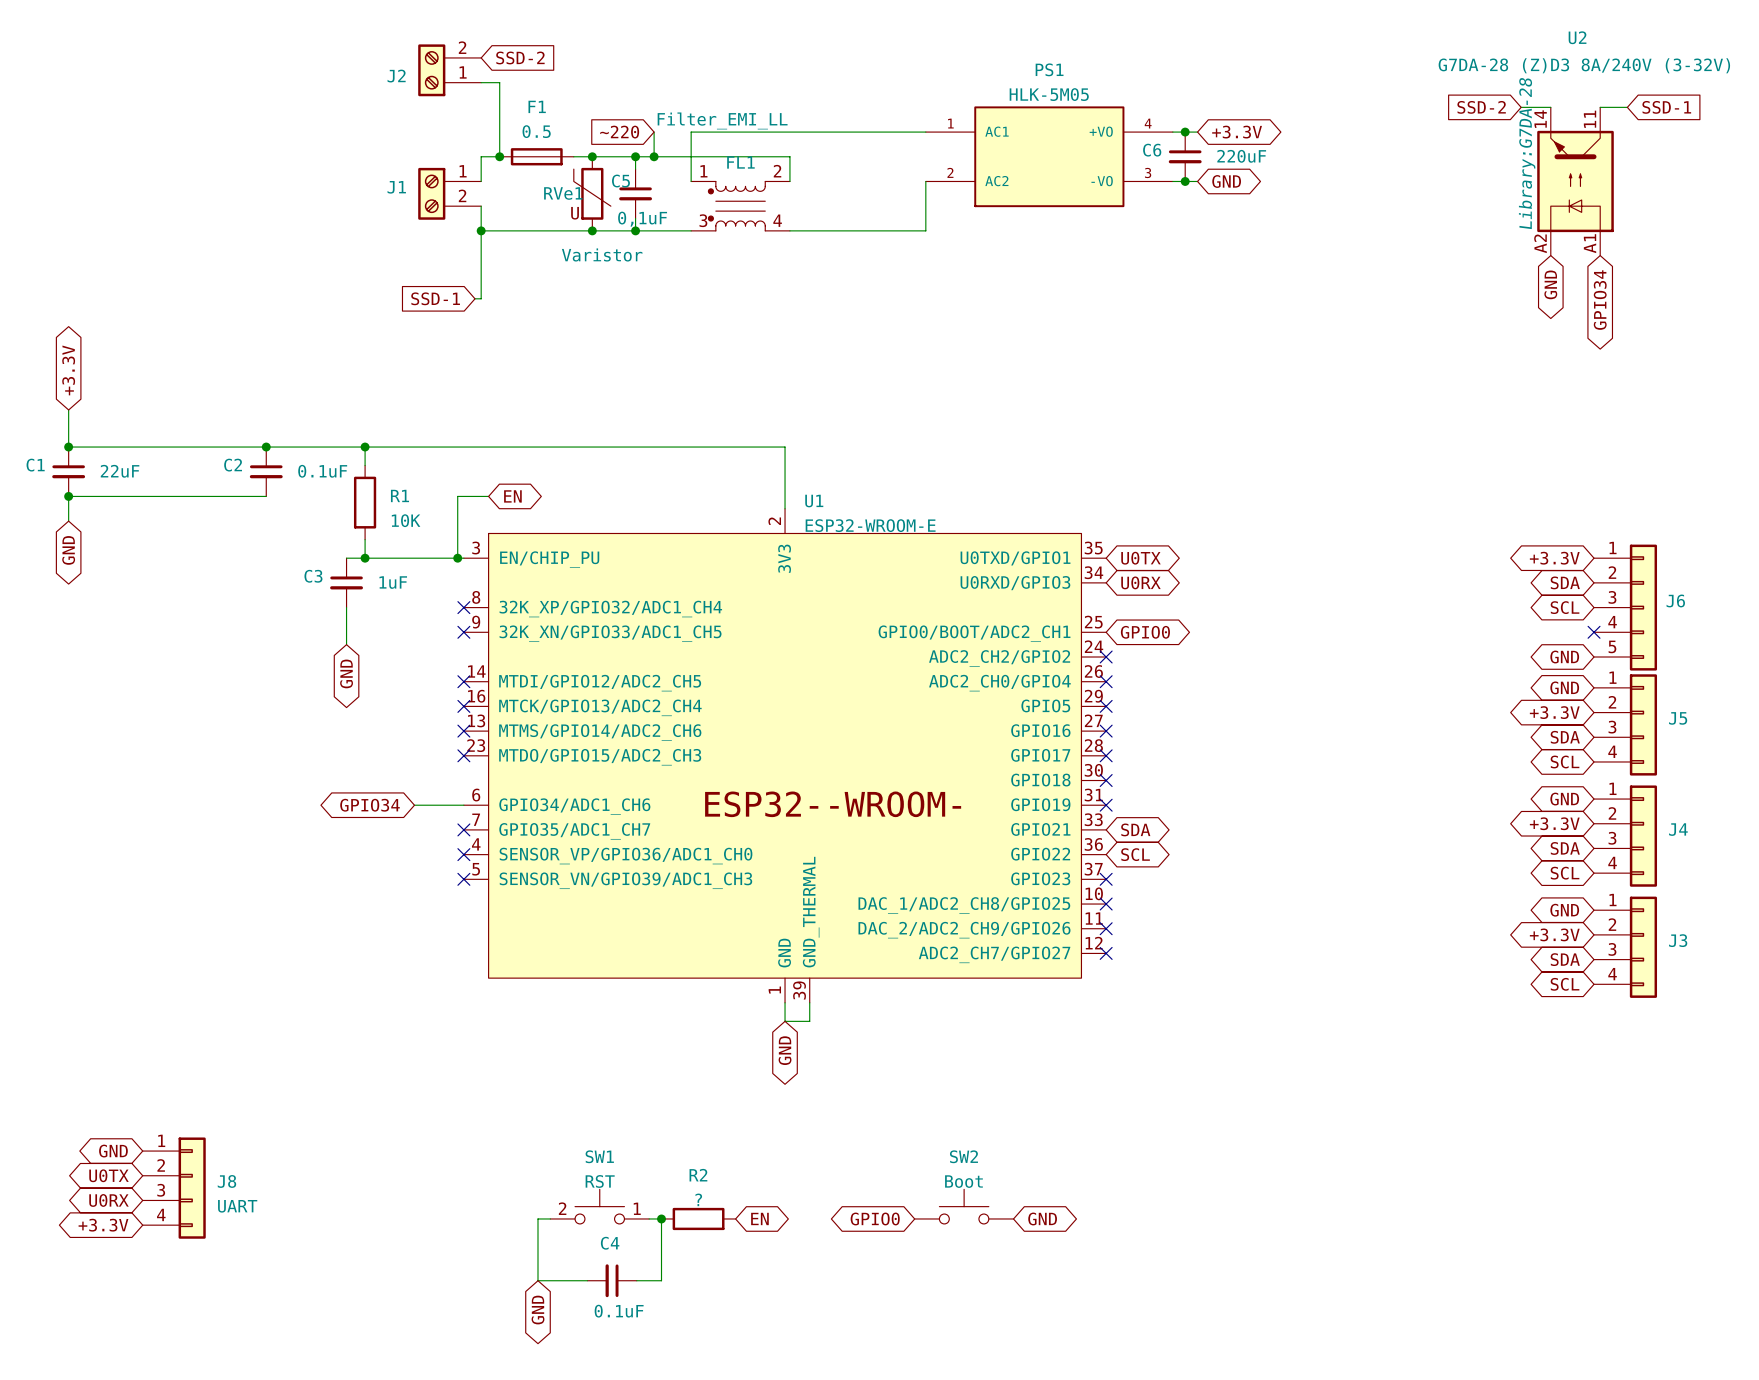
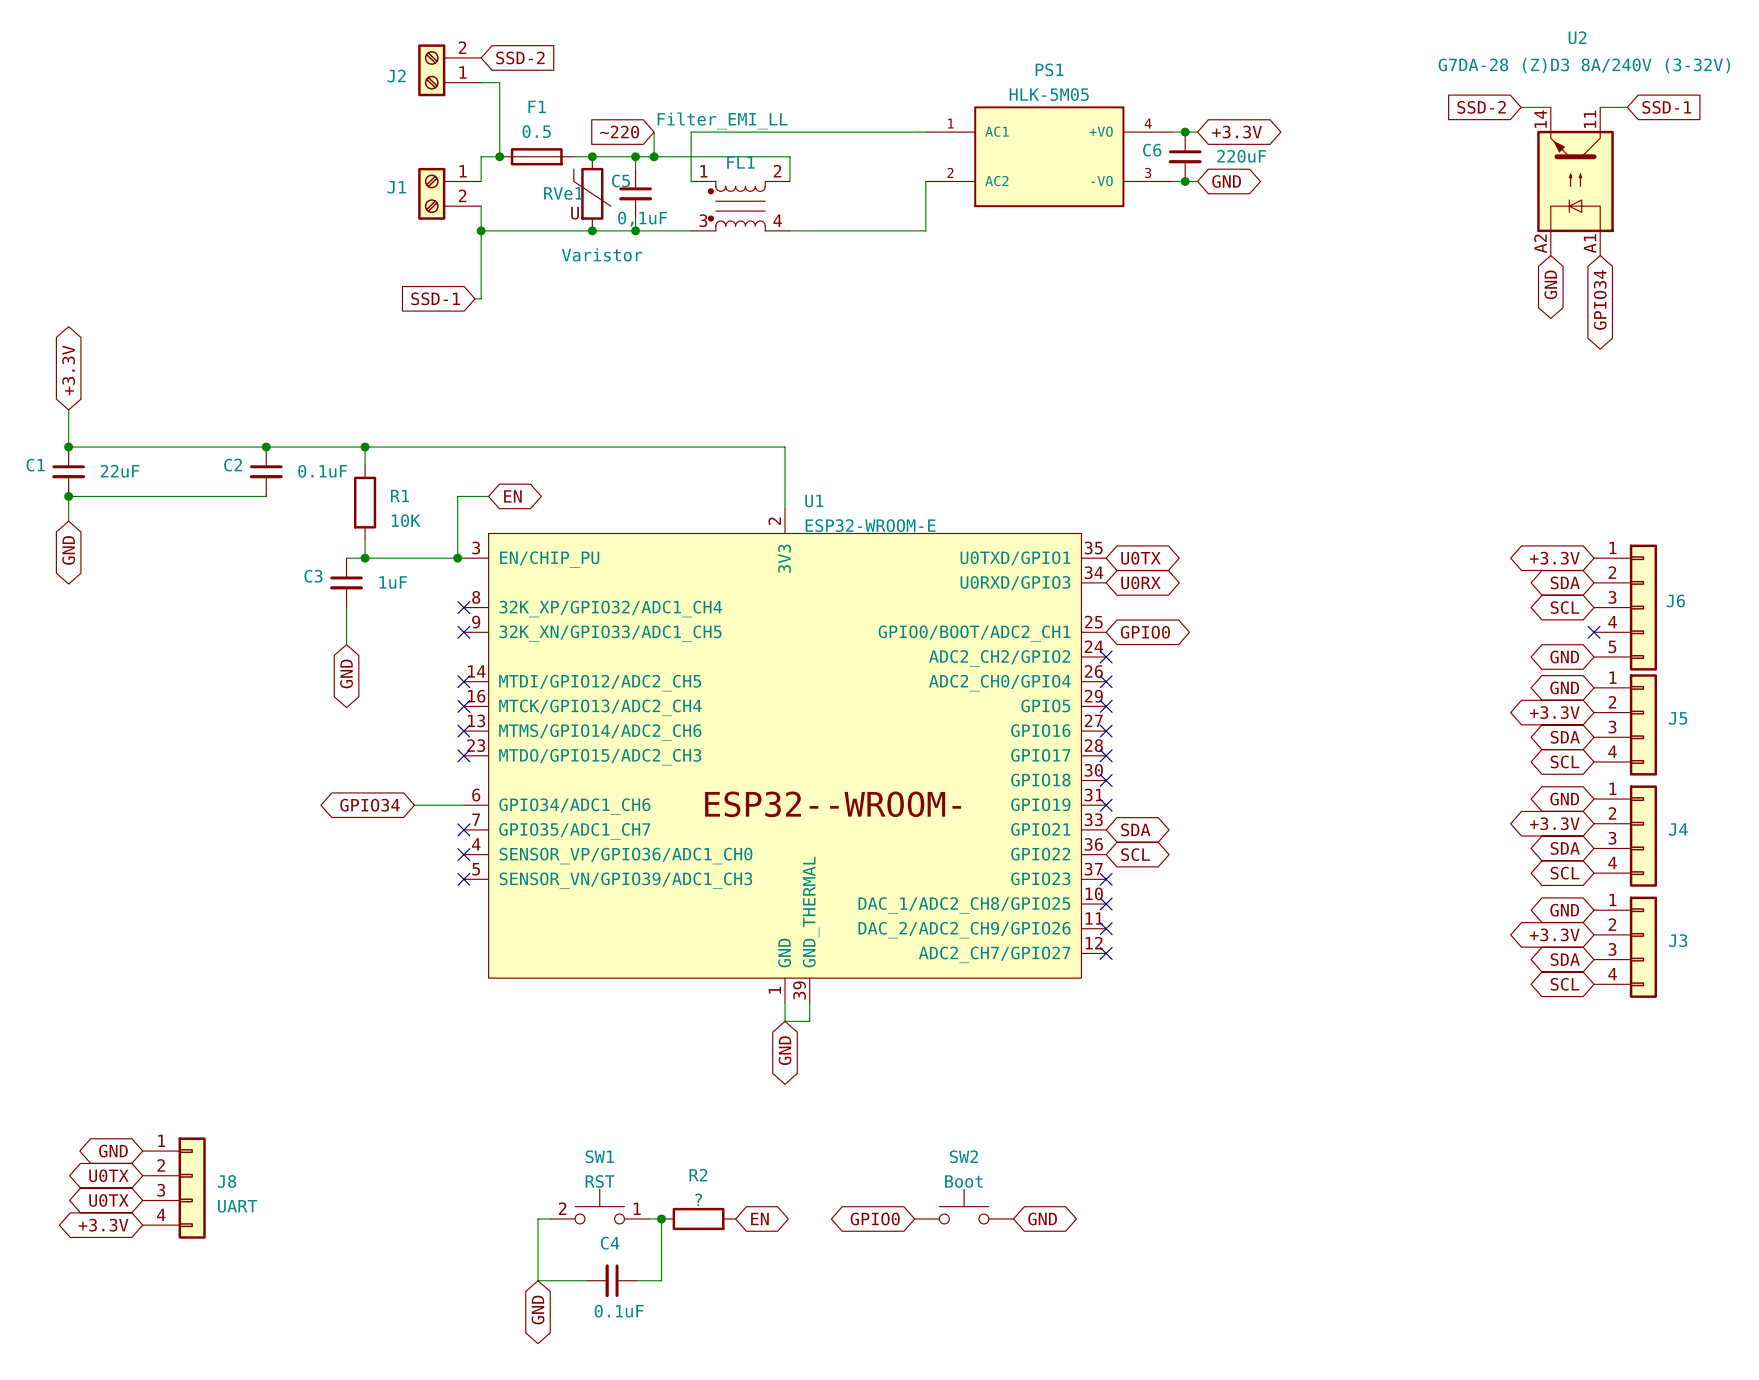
U2 text: Library:G7DA-28 (1527, 153) -> none
global label: U0RX (108, 1200) -> U0TX (108, 1200)

